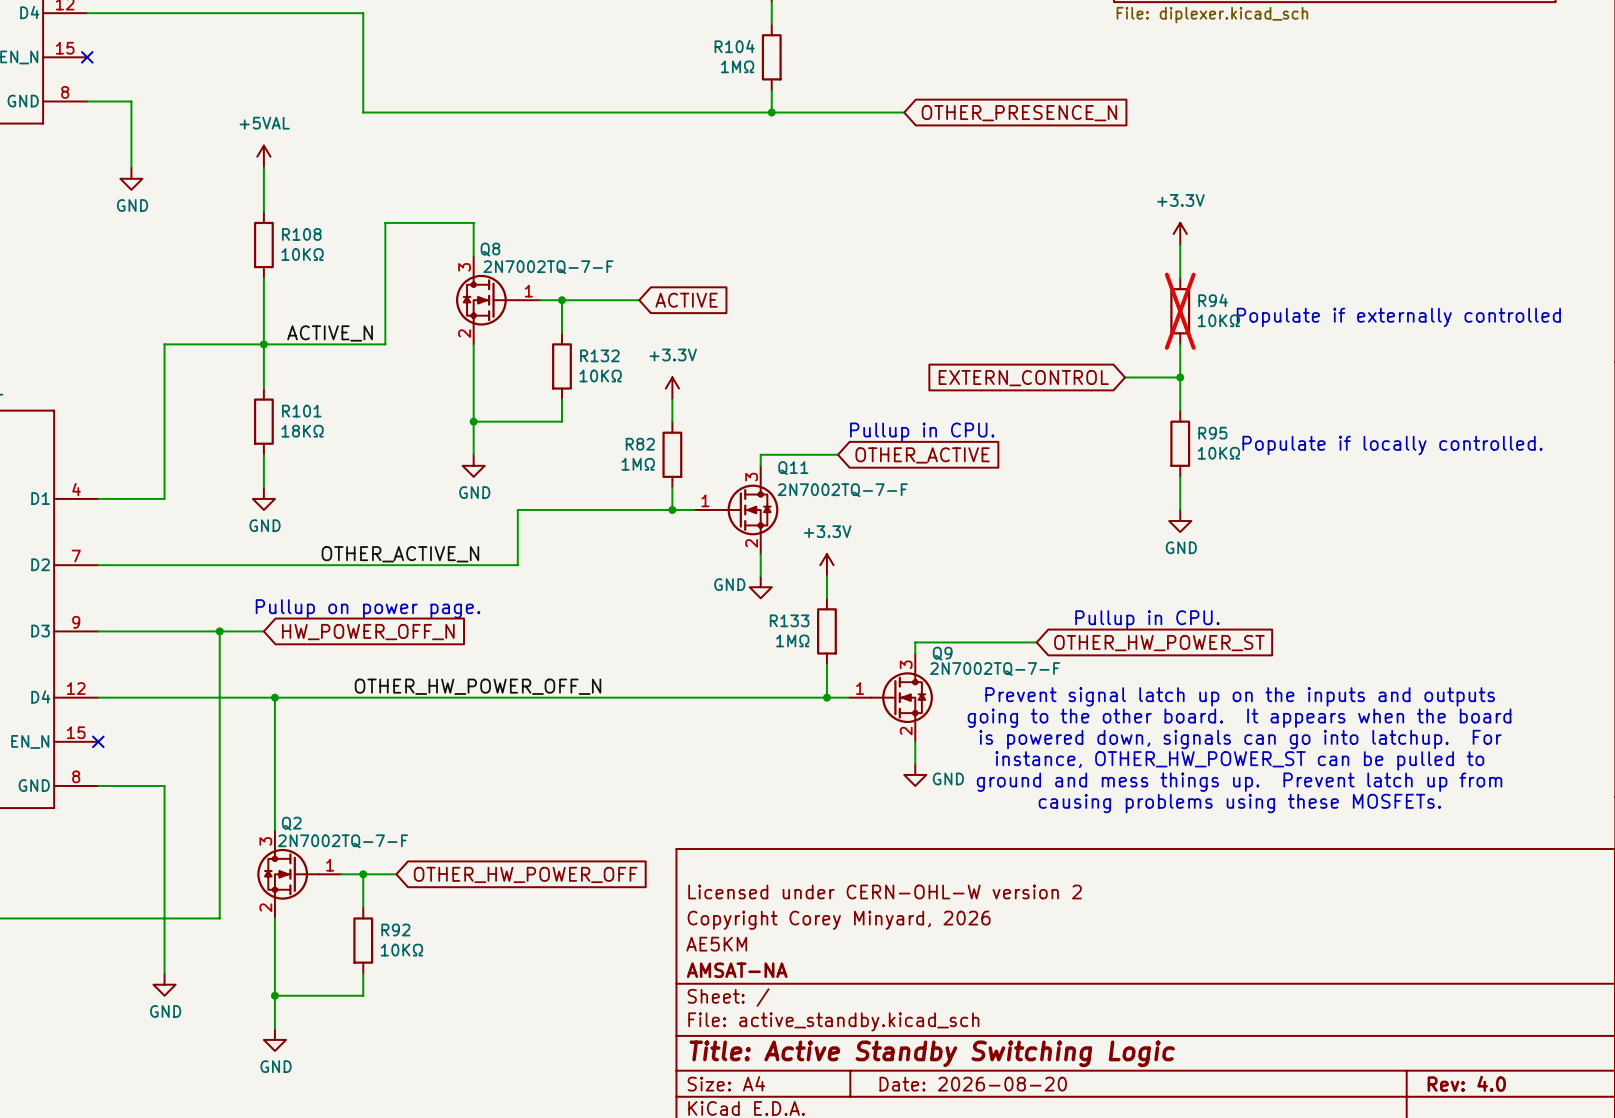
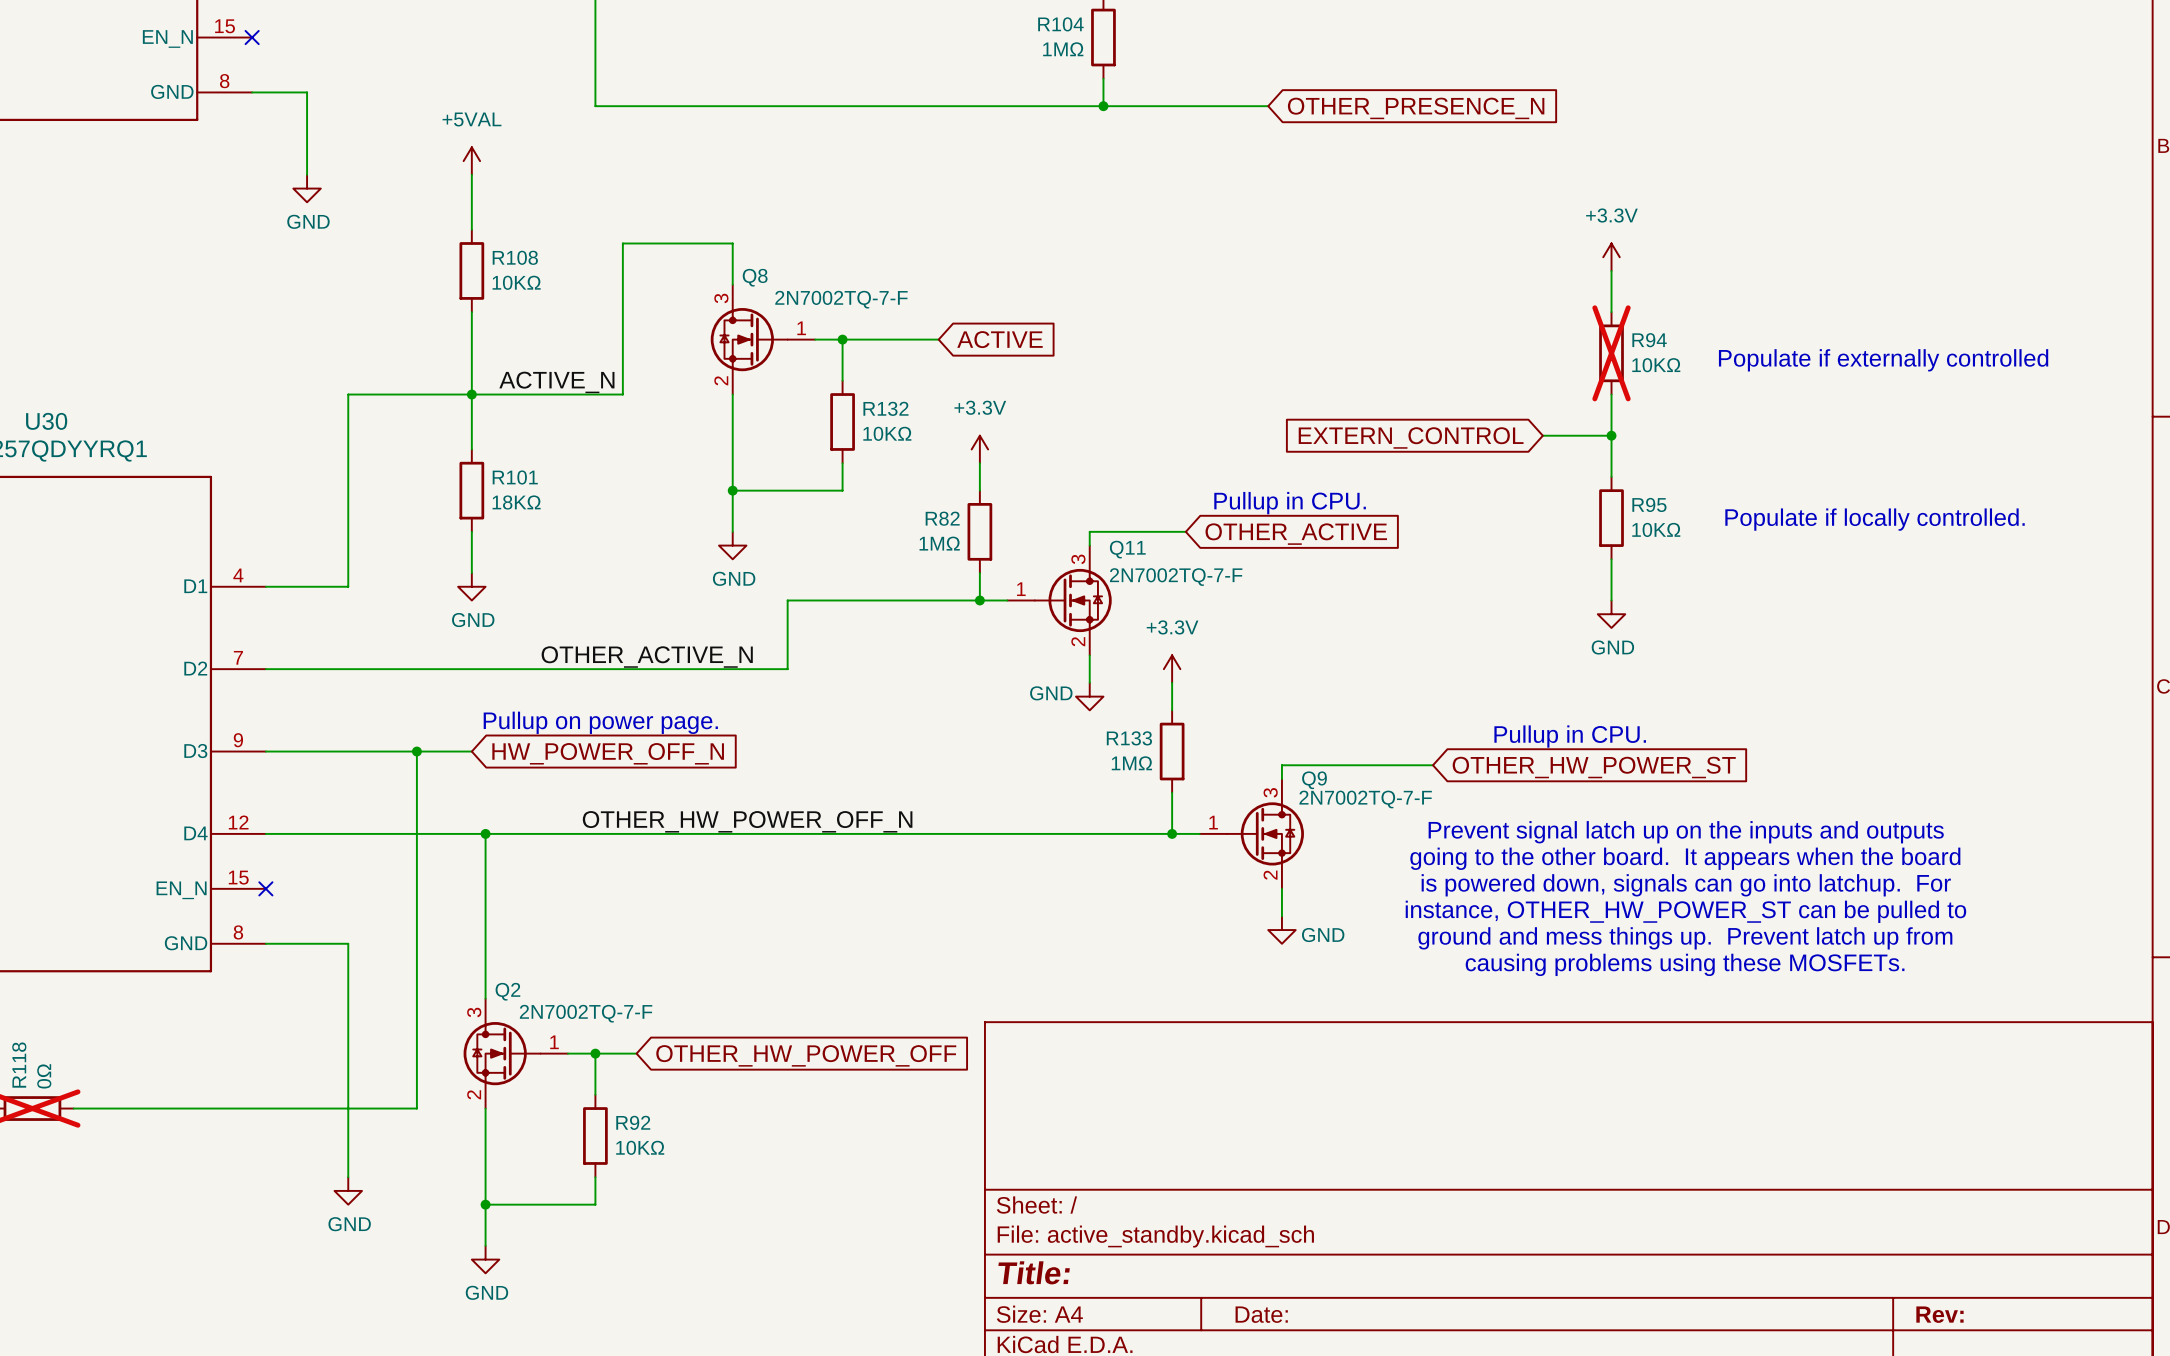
title block: Licensed under CERN-OHL-W version 2 (885, 891) -> none
title block: Copyright Corey Minyard, 2026 (839, 920) -> none
title block: AE5KM (716, 944) -> none
title block: AMSAT-NA (737, 970) -> none
title block: Title: Active Standby Switching Logic (932, 1053) -> Title: (1034, 1272)
title block: Rev: 4.0 (1466, 1083) -> Rev: (1939, 1314)
title block: Date: 2026-08-20 (973, 1084) -> Date: (1261, 1314)

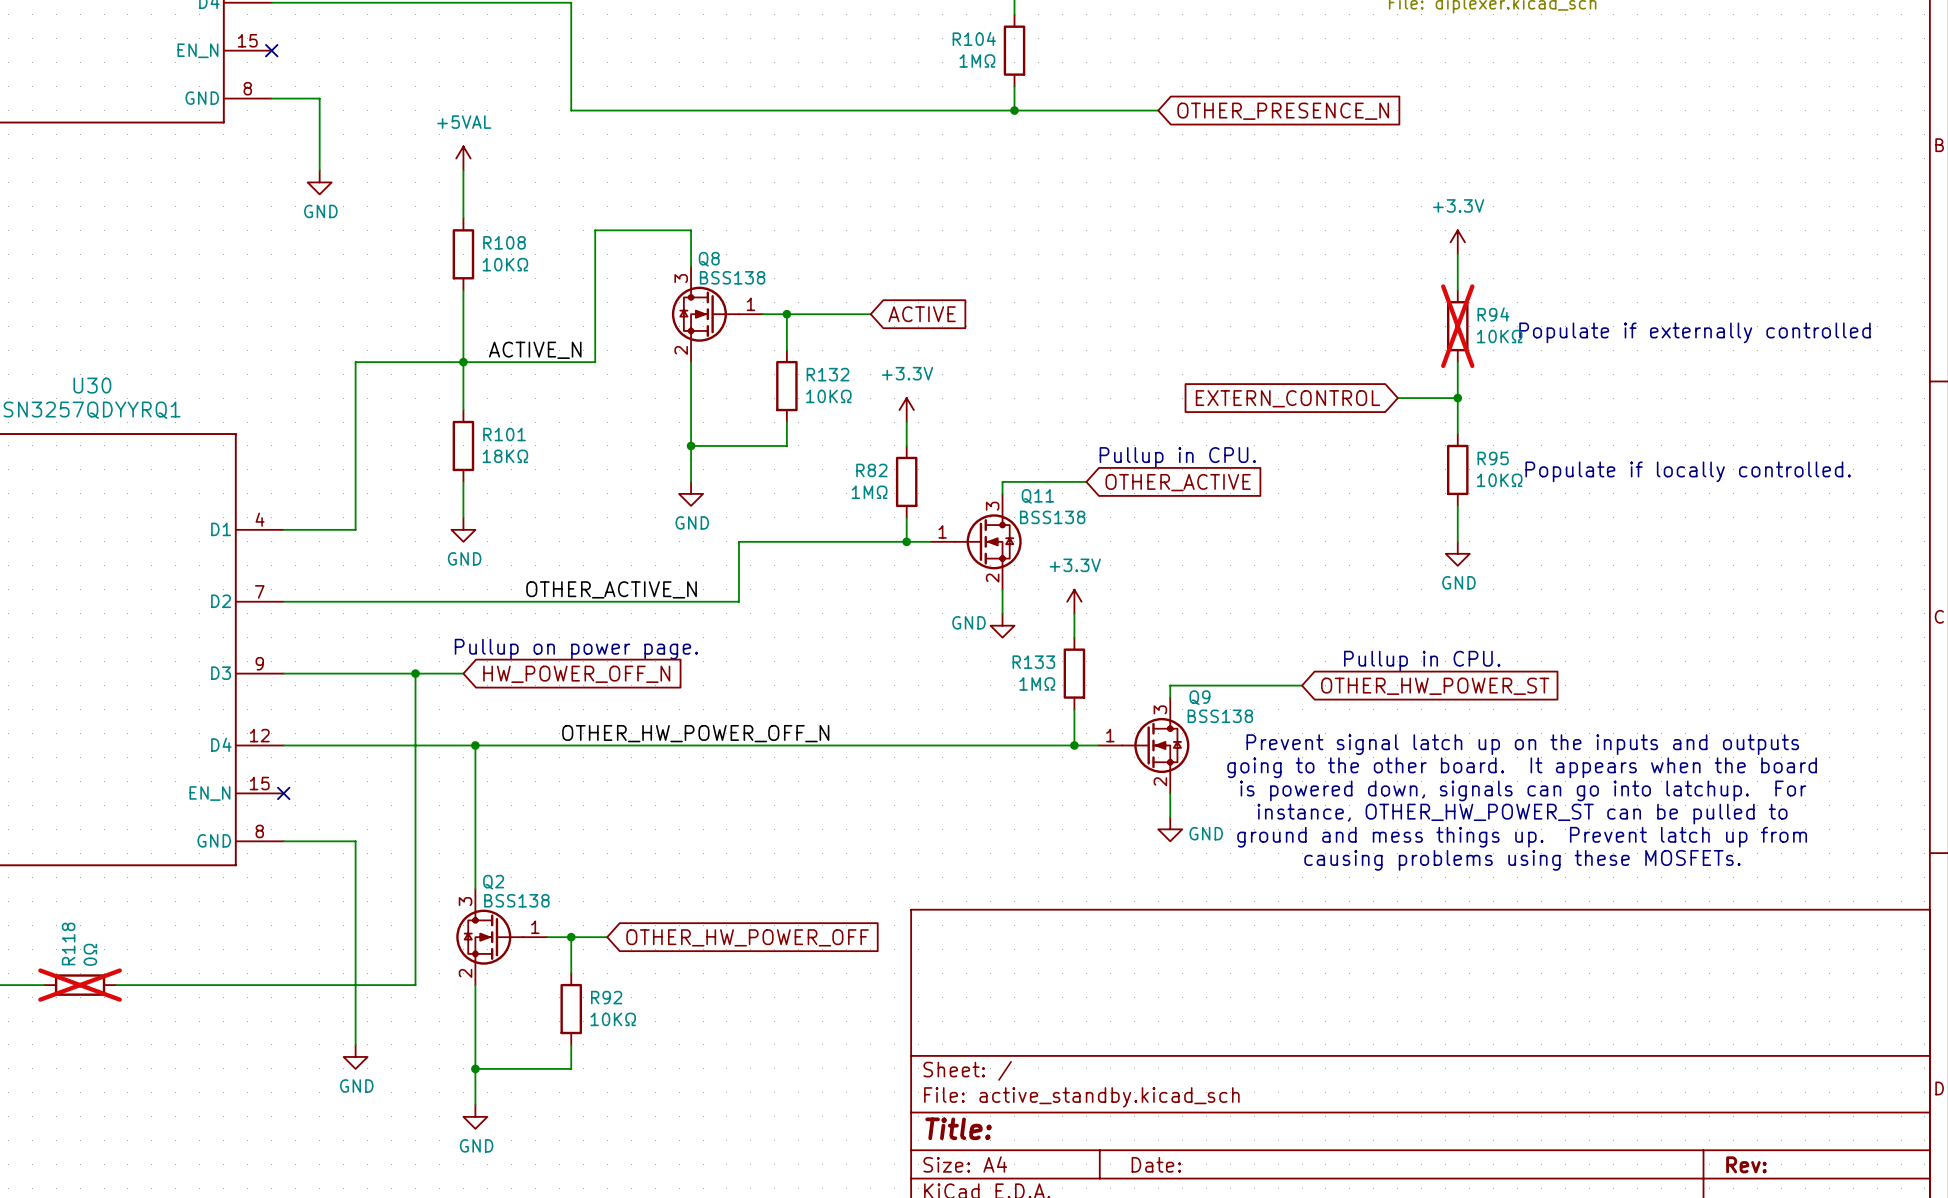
Q8 value: 2N7002TQ-7-F (841, 299) -> BSS138 (732, 277)
Q11 value: 2N7002TQ-7-F (1176, 577) -> BSS138 (1052, 517)
Q9 value: 2N7002TQ-7-F (1365, 799) -> BSS138 (1220, 716)
Q2 value: 2N7002TQ-7-F (586, 1013) -> BSS138 (516, 900)

